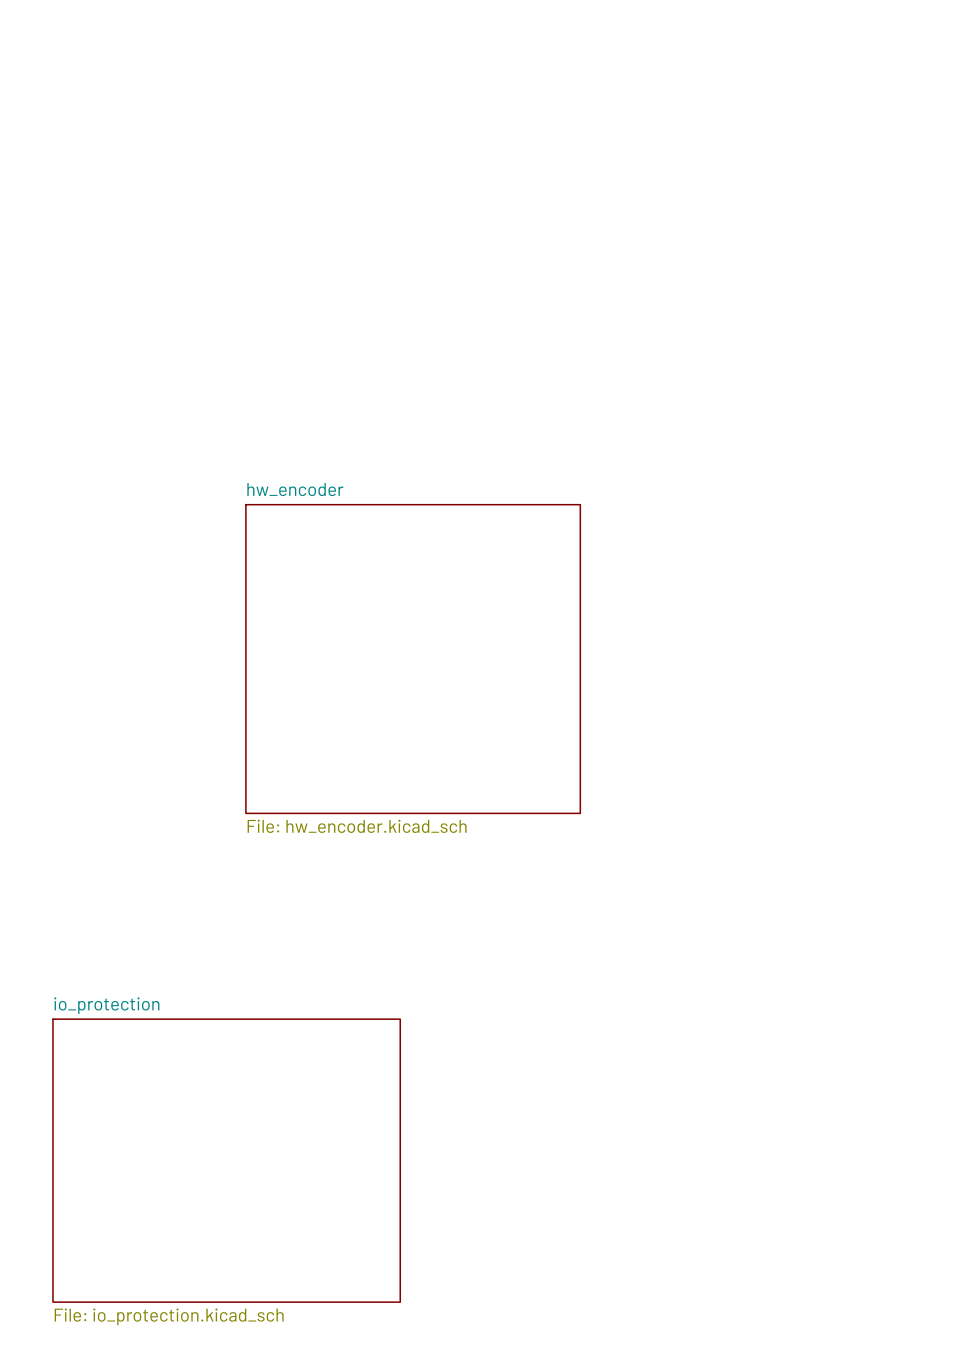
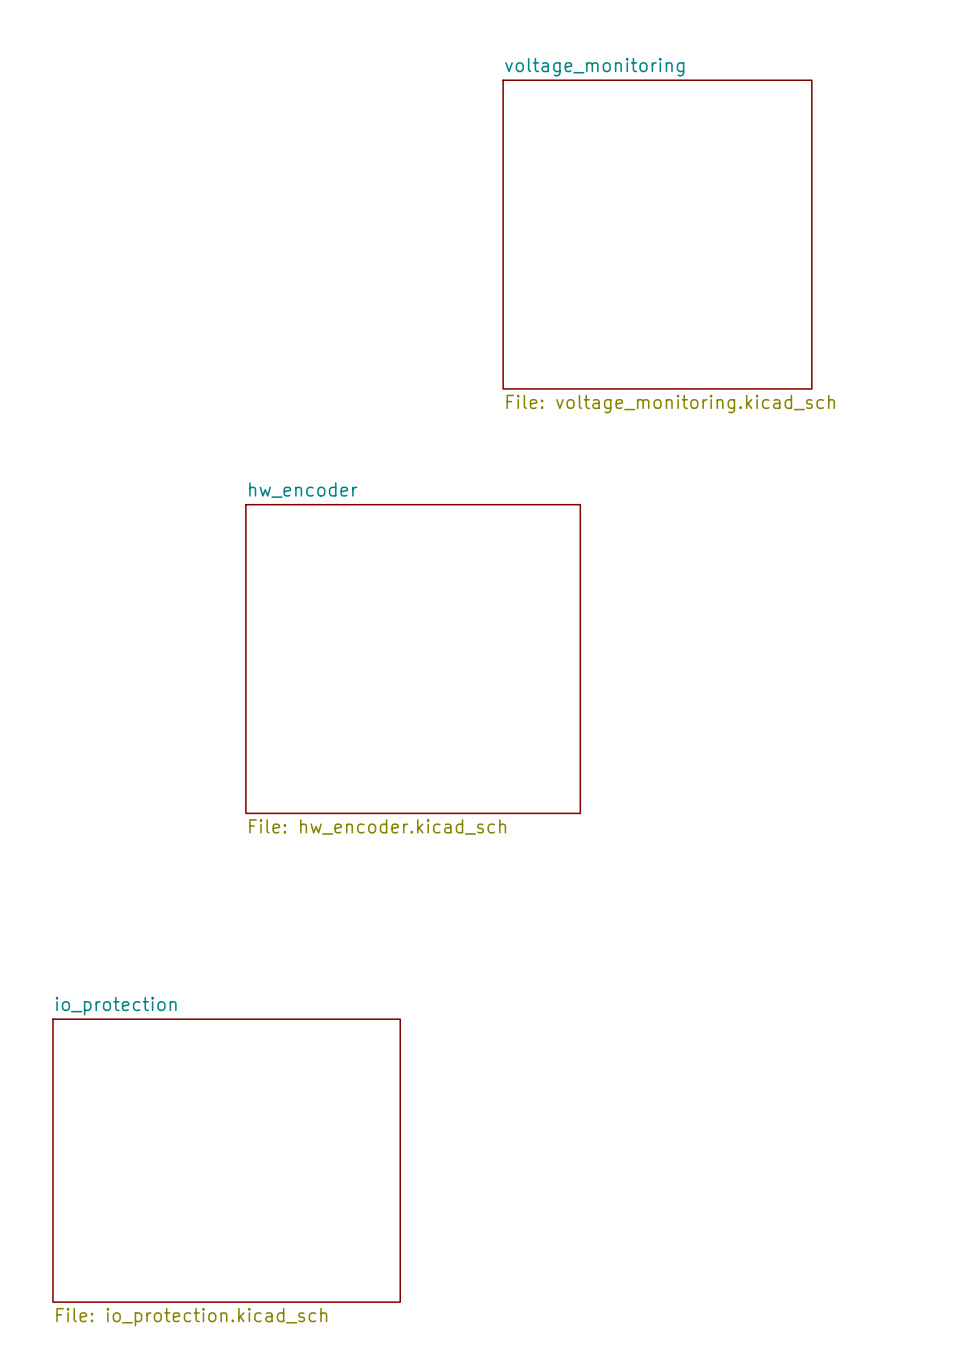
sheet voltage_monitoring: none -> File: voltage_monitoring.kicad_sch (657, 234)

